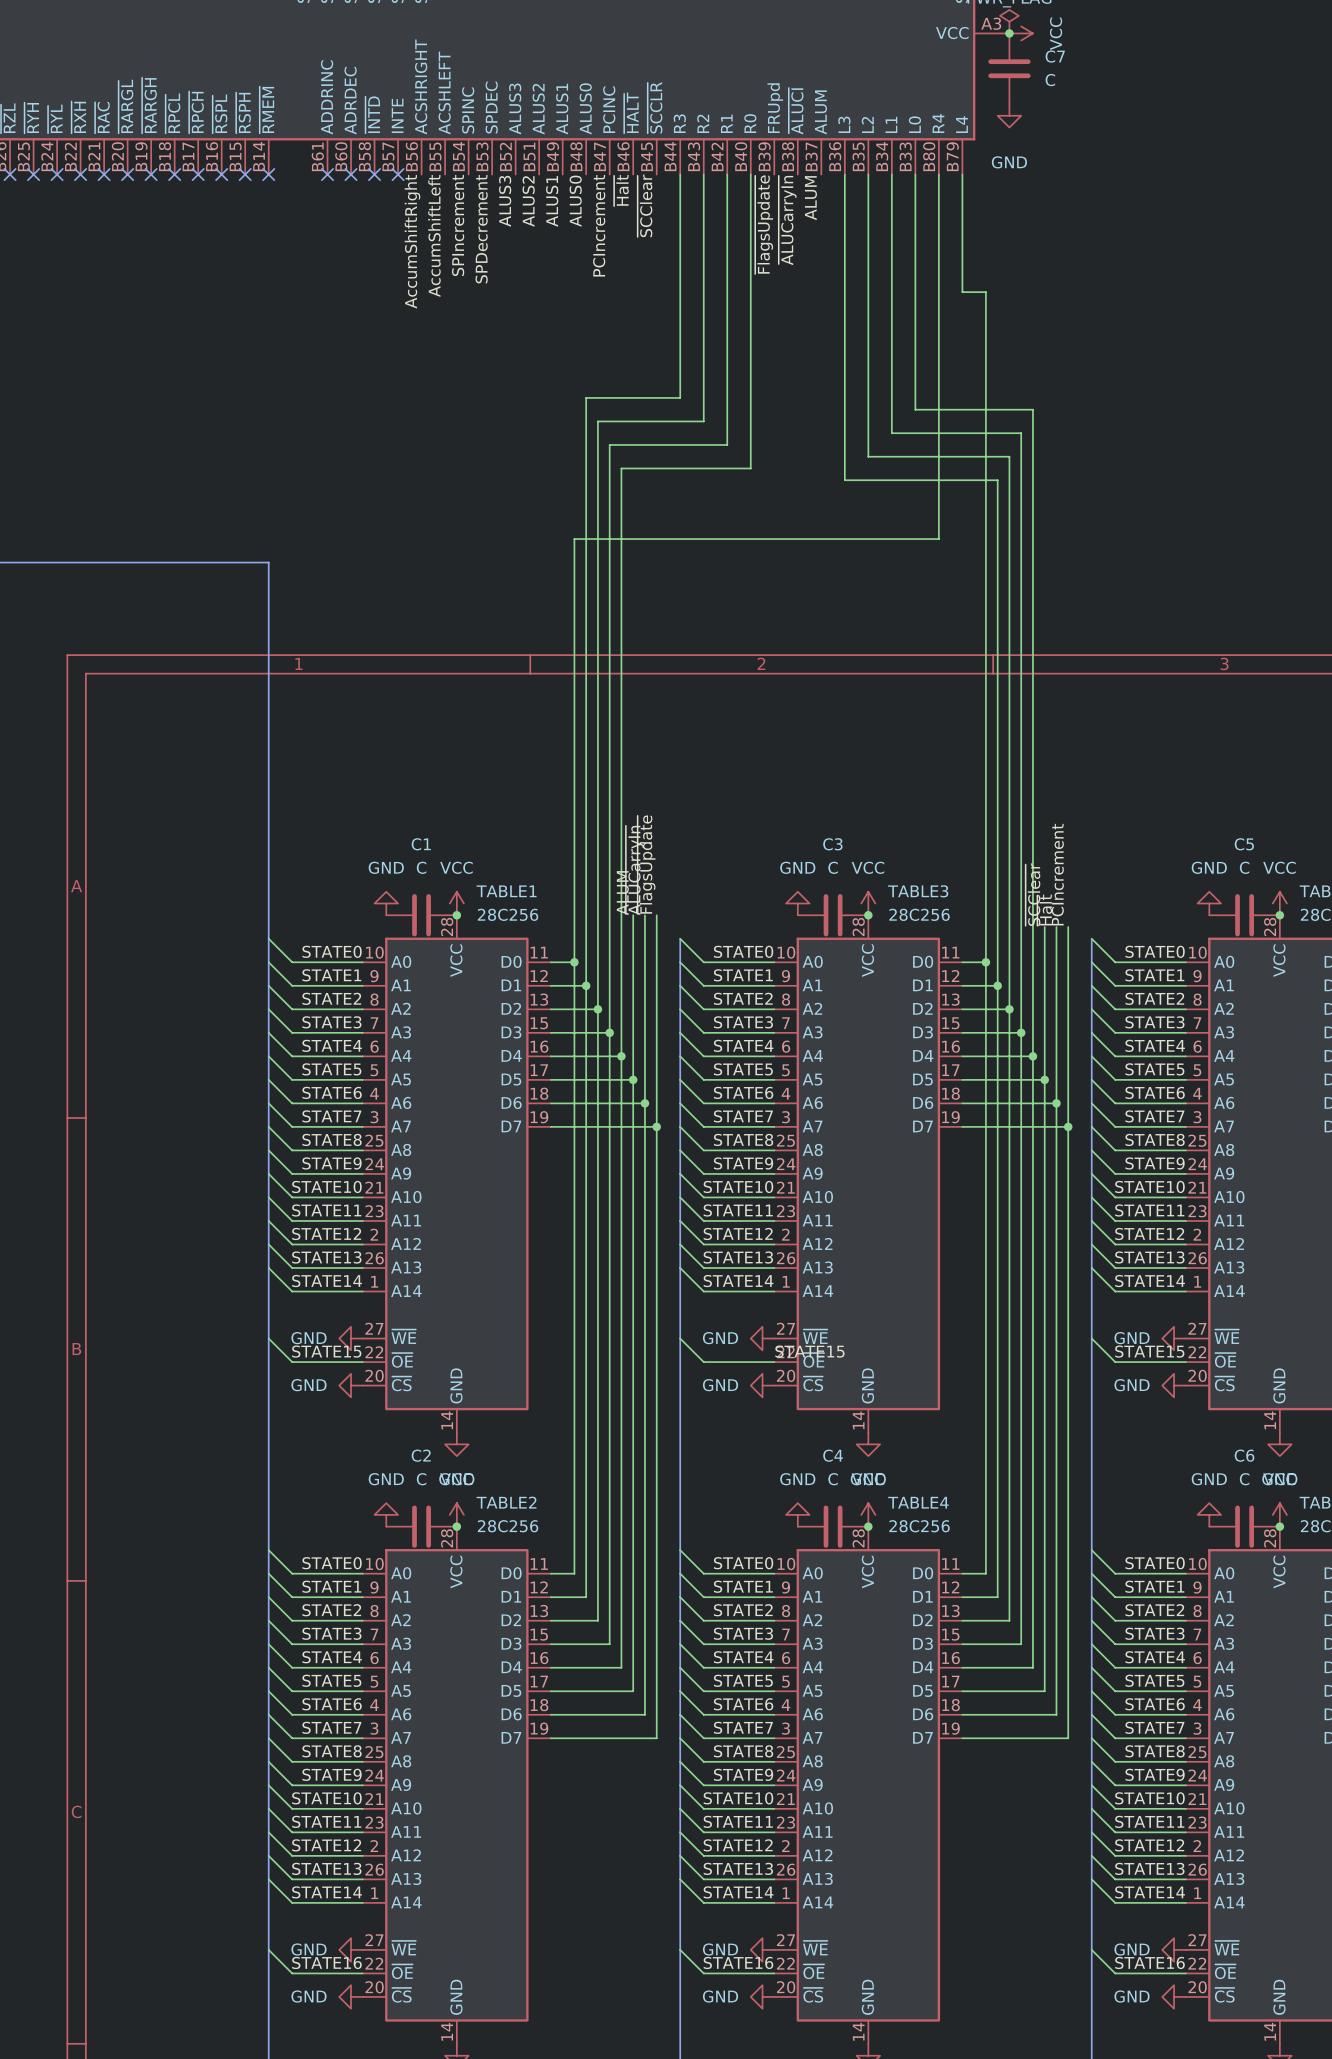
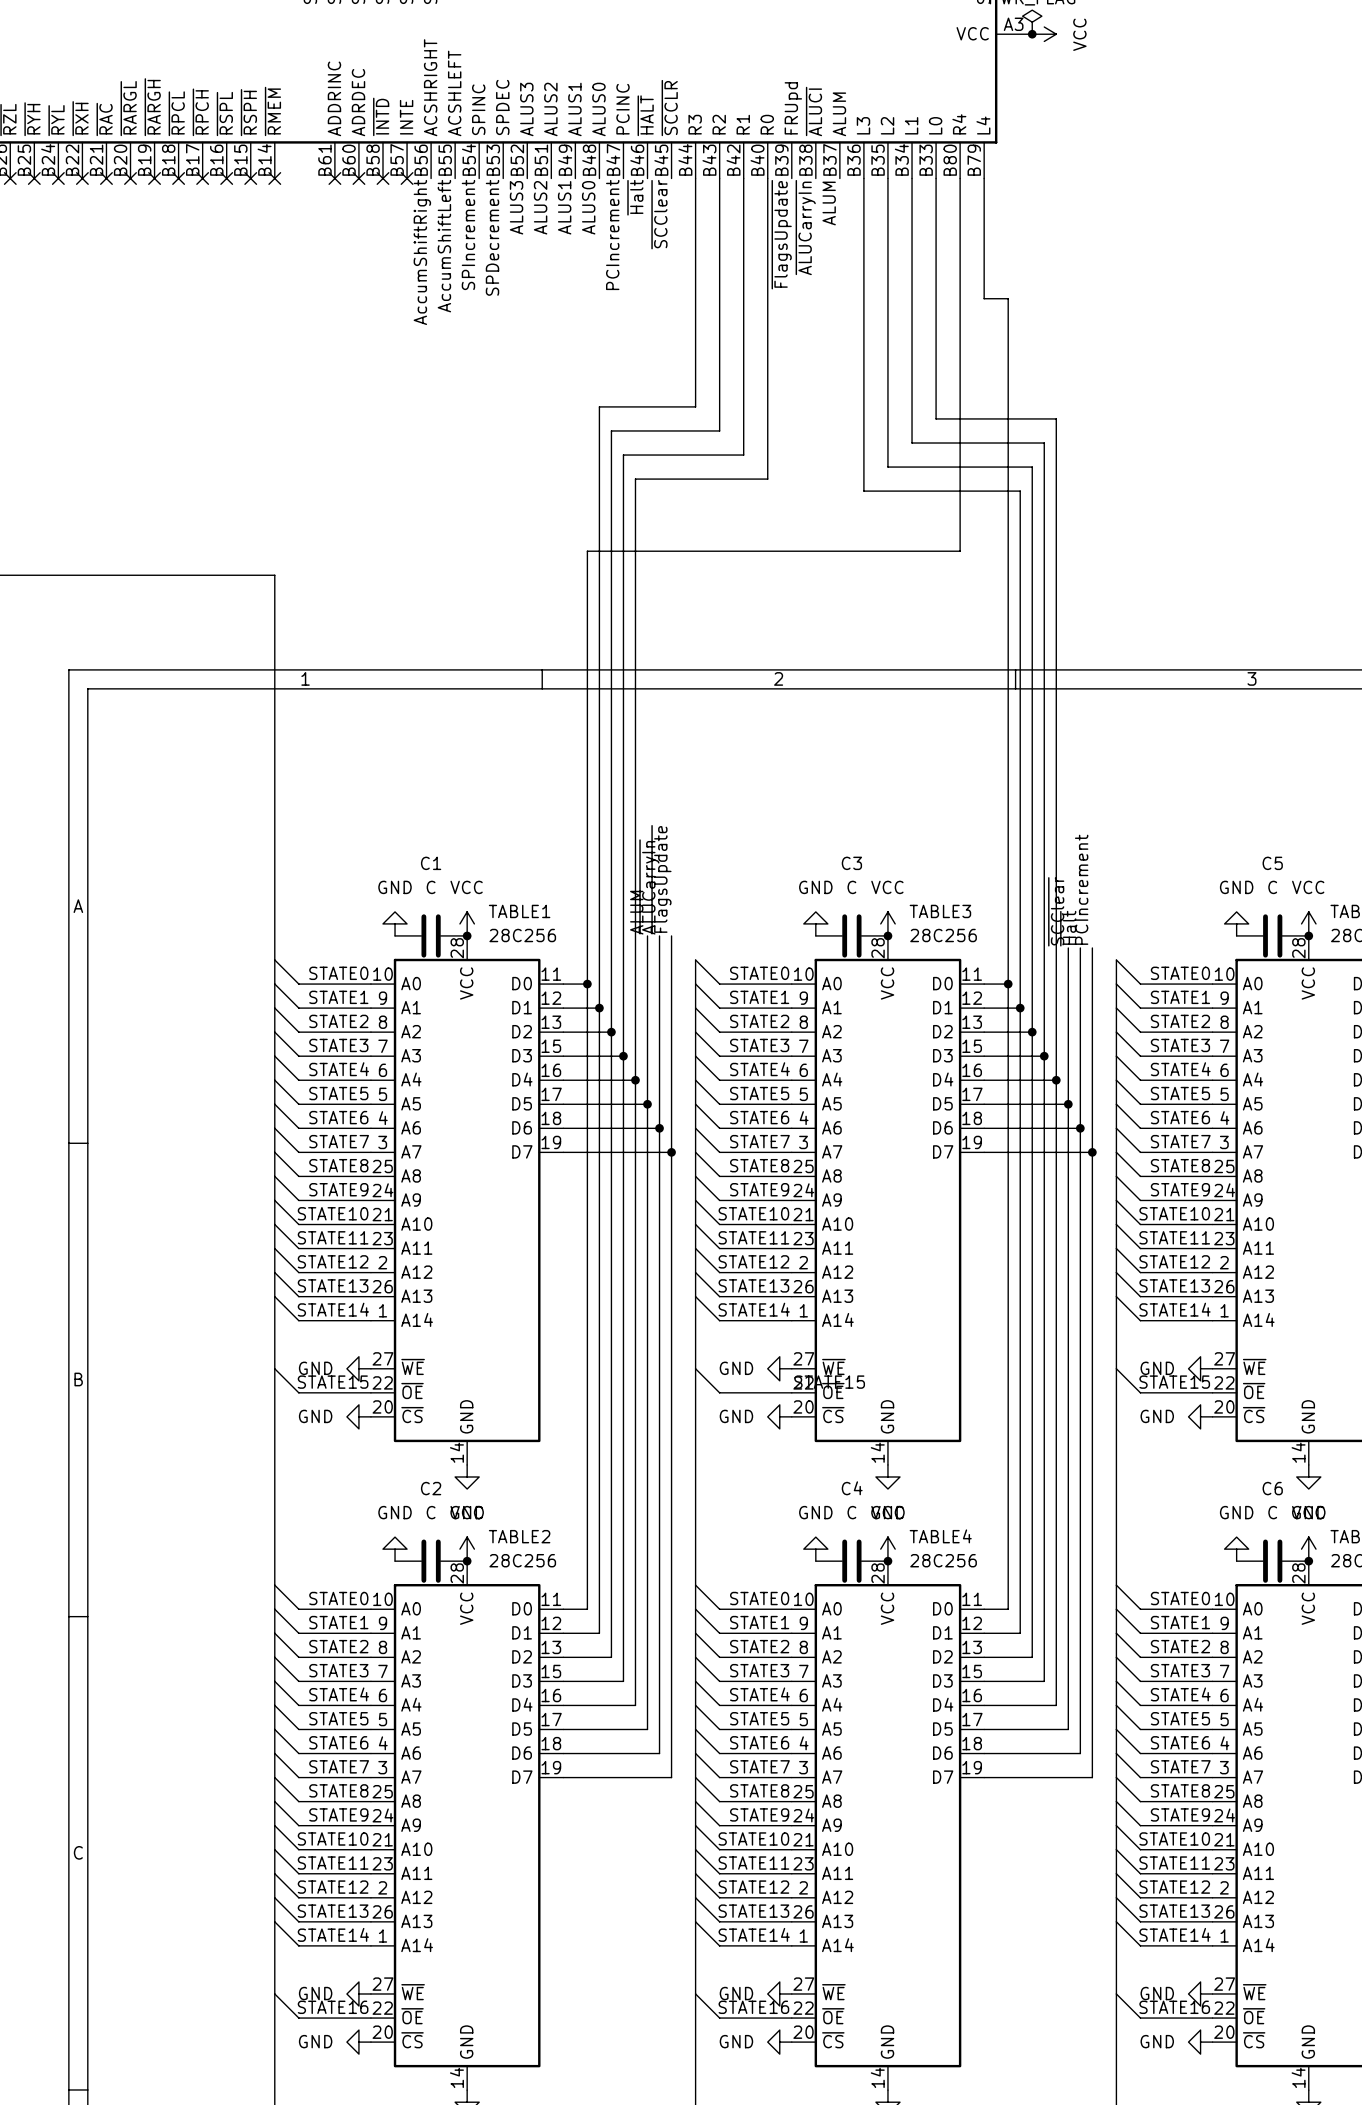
C7: C (1009, 68) -> none
power symbol: GND (1009, 115) -> none

